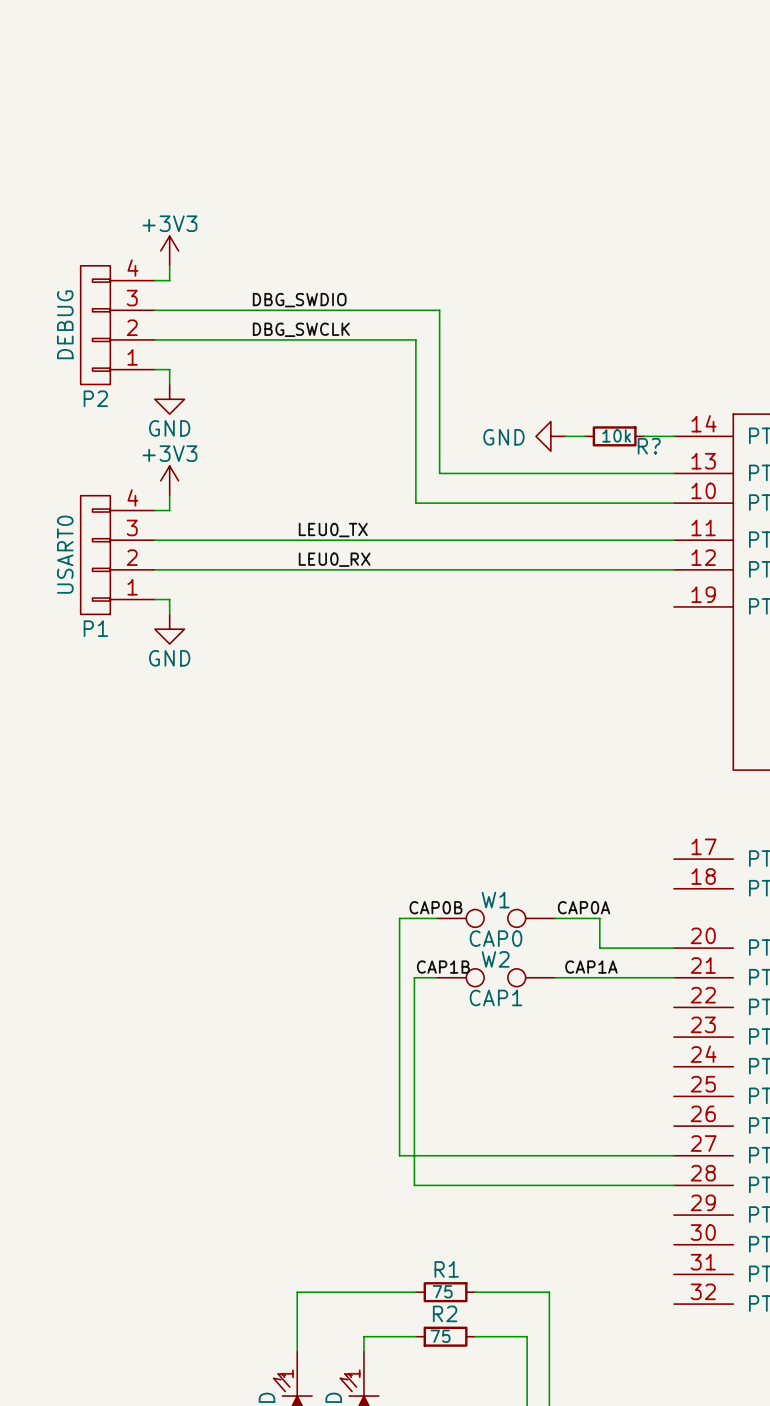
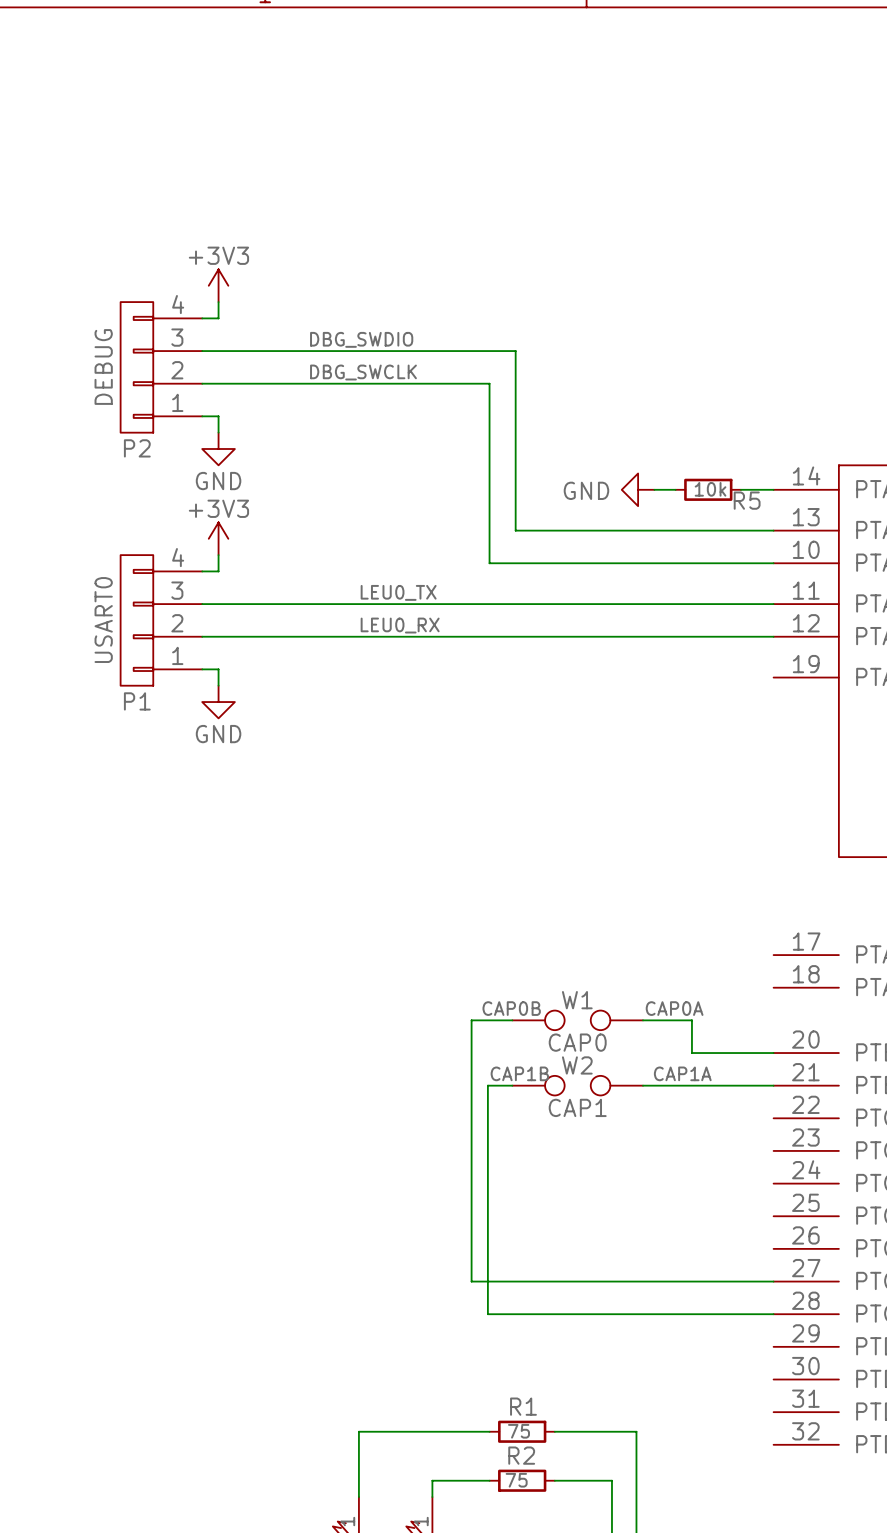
R? name: R? (649, 446) -> R5 (747, 500)

